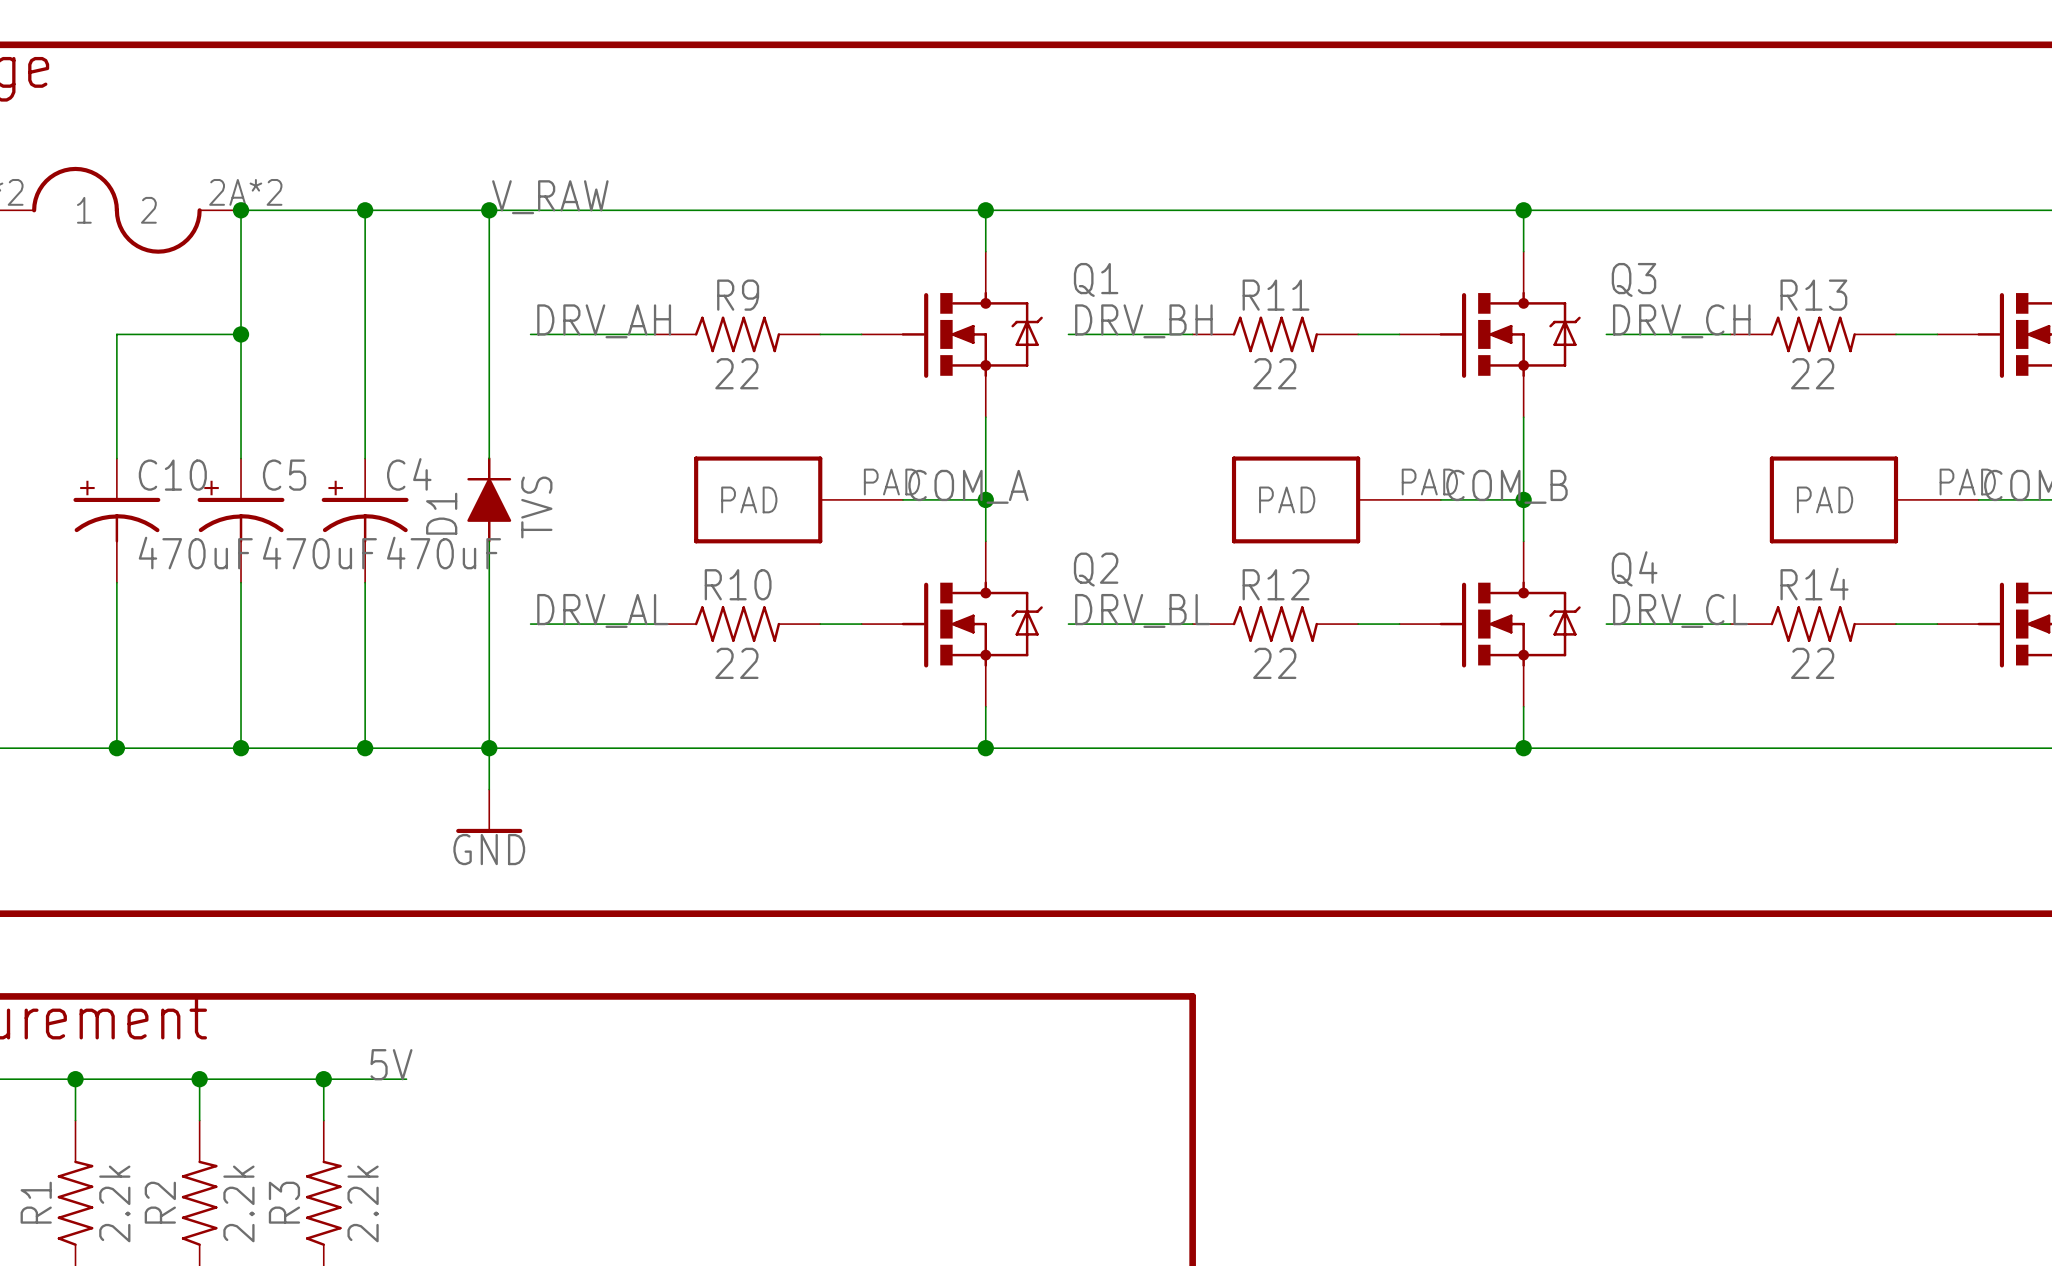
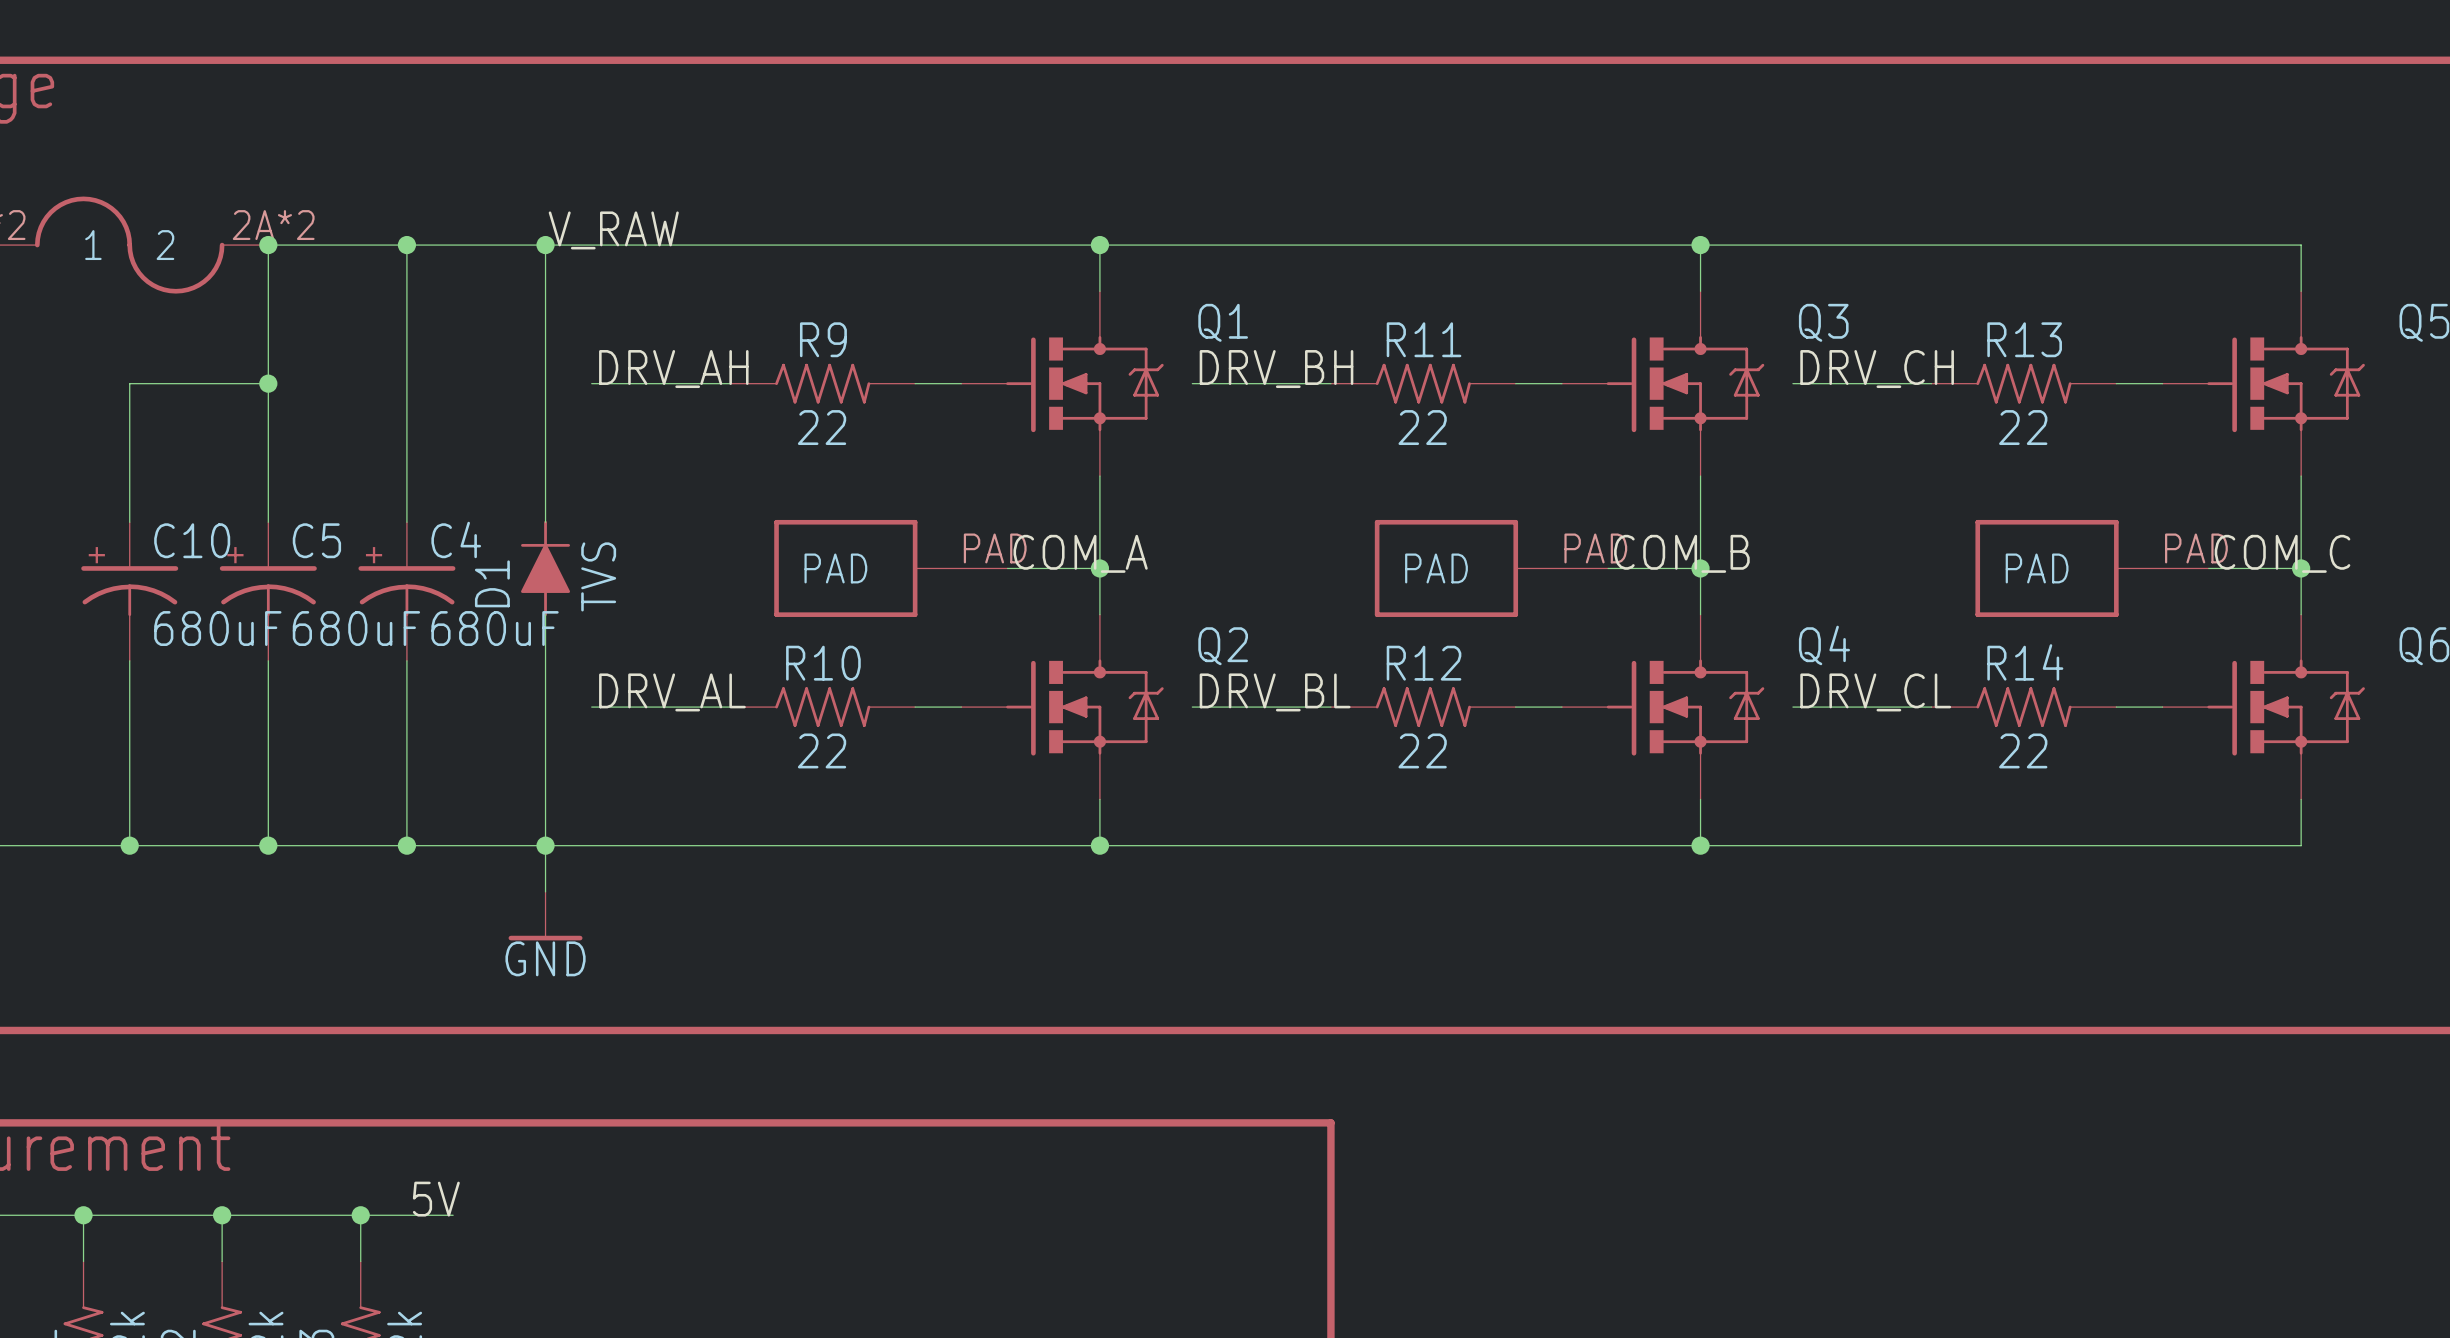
C10 value: 470uF (195, 553) -> 680uF (217, 628)
C5 value: 470uF (319, 553) -> 680uF (356, 628)
C4 value: 470uF (444, 553) -> 680uF (495, 628)

